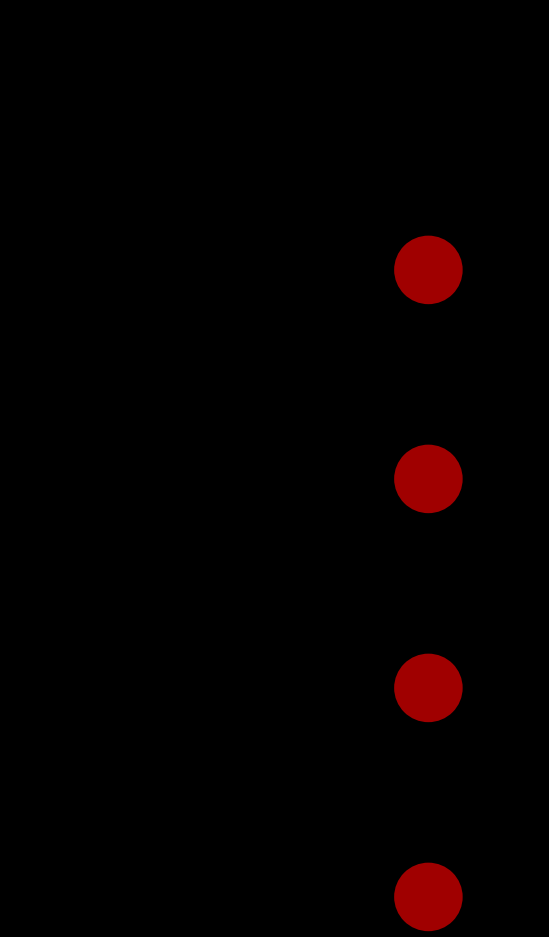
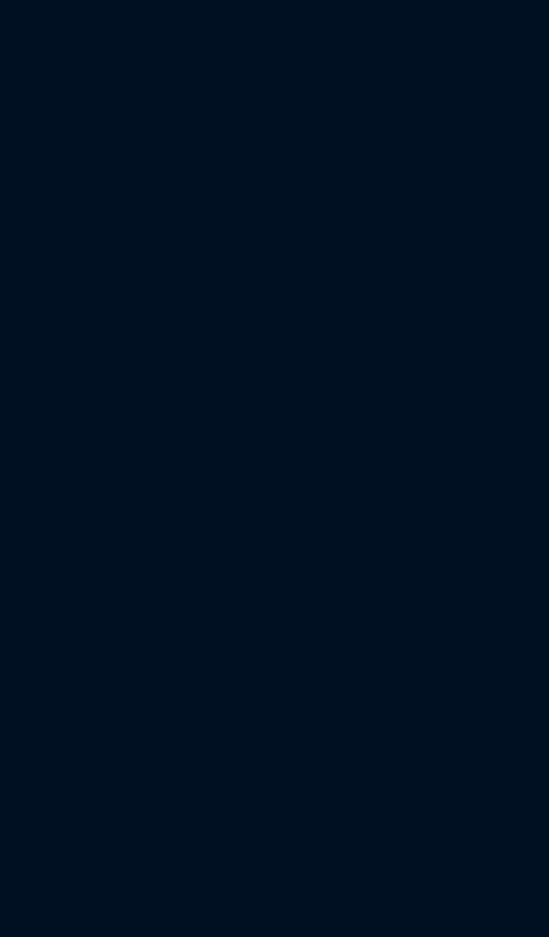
part: (428, 269) -> none
part: (428, 478) -> none
part: (428, 687) -> none
part: (428, 896) -> none

